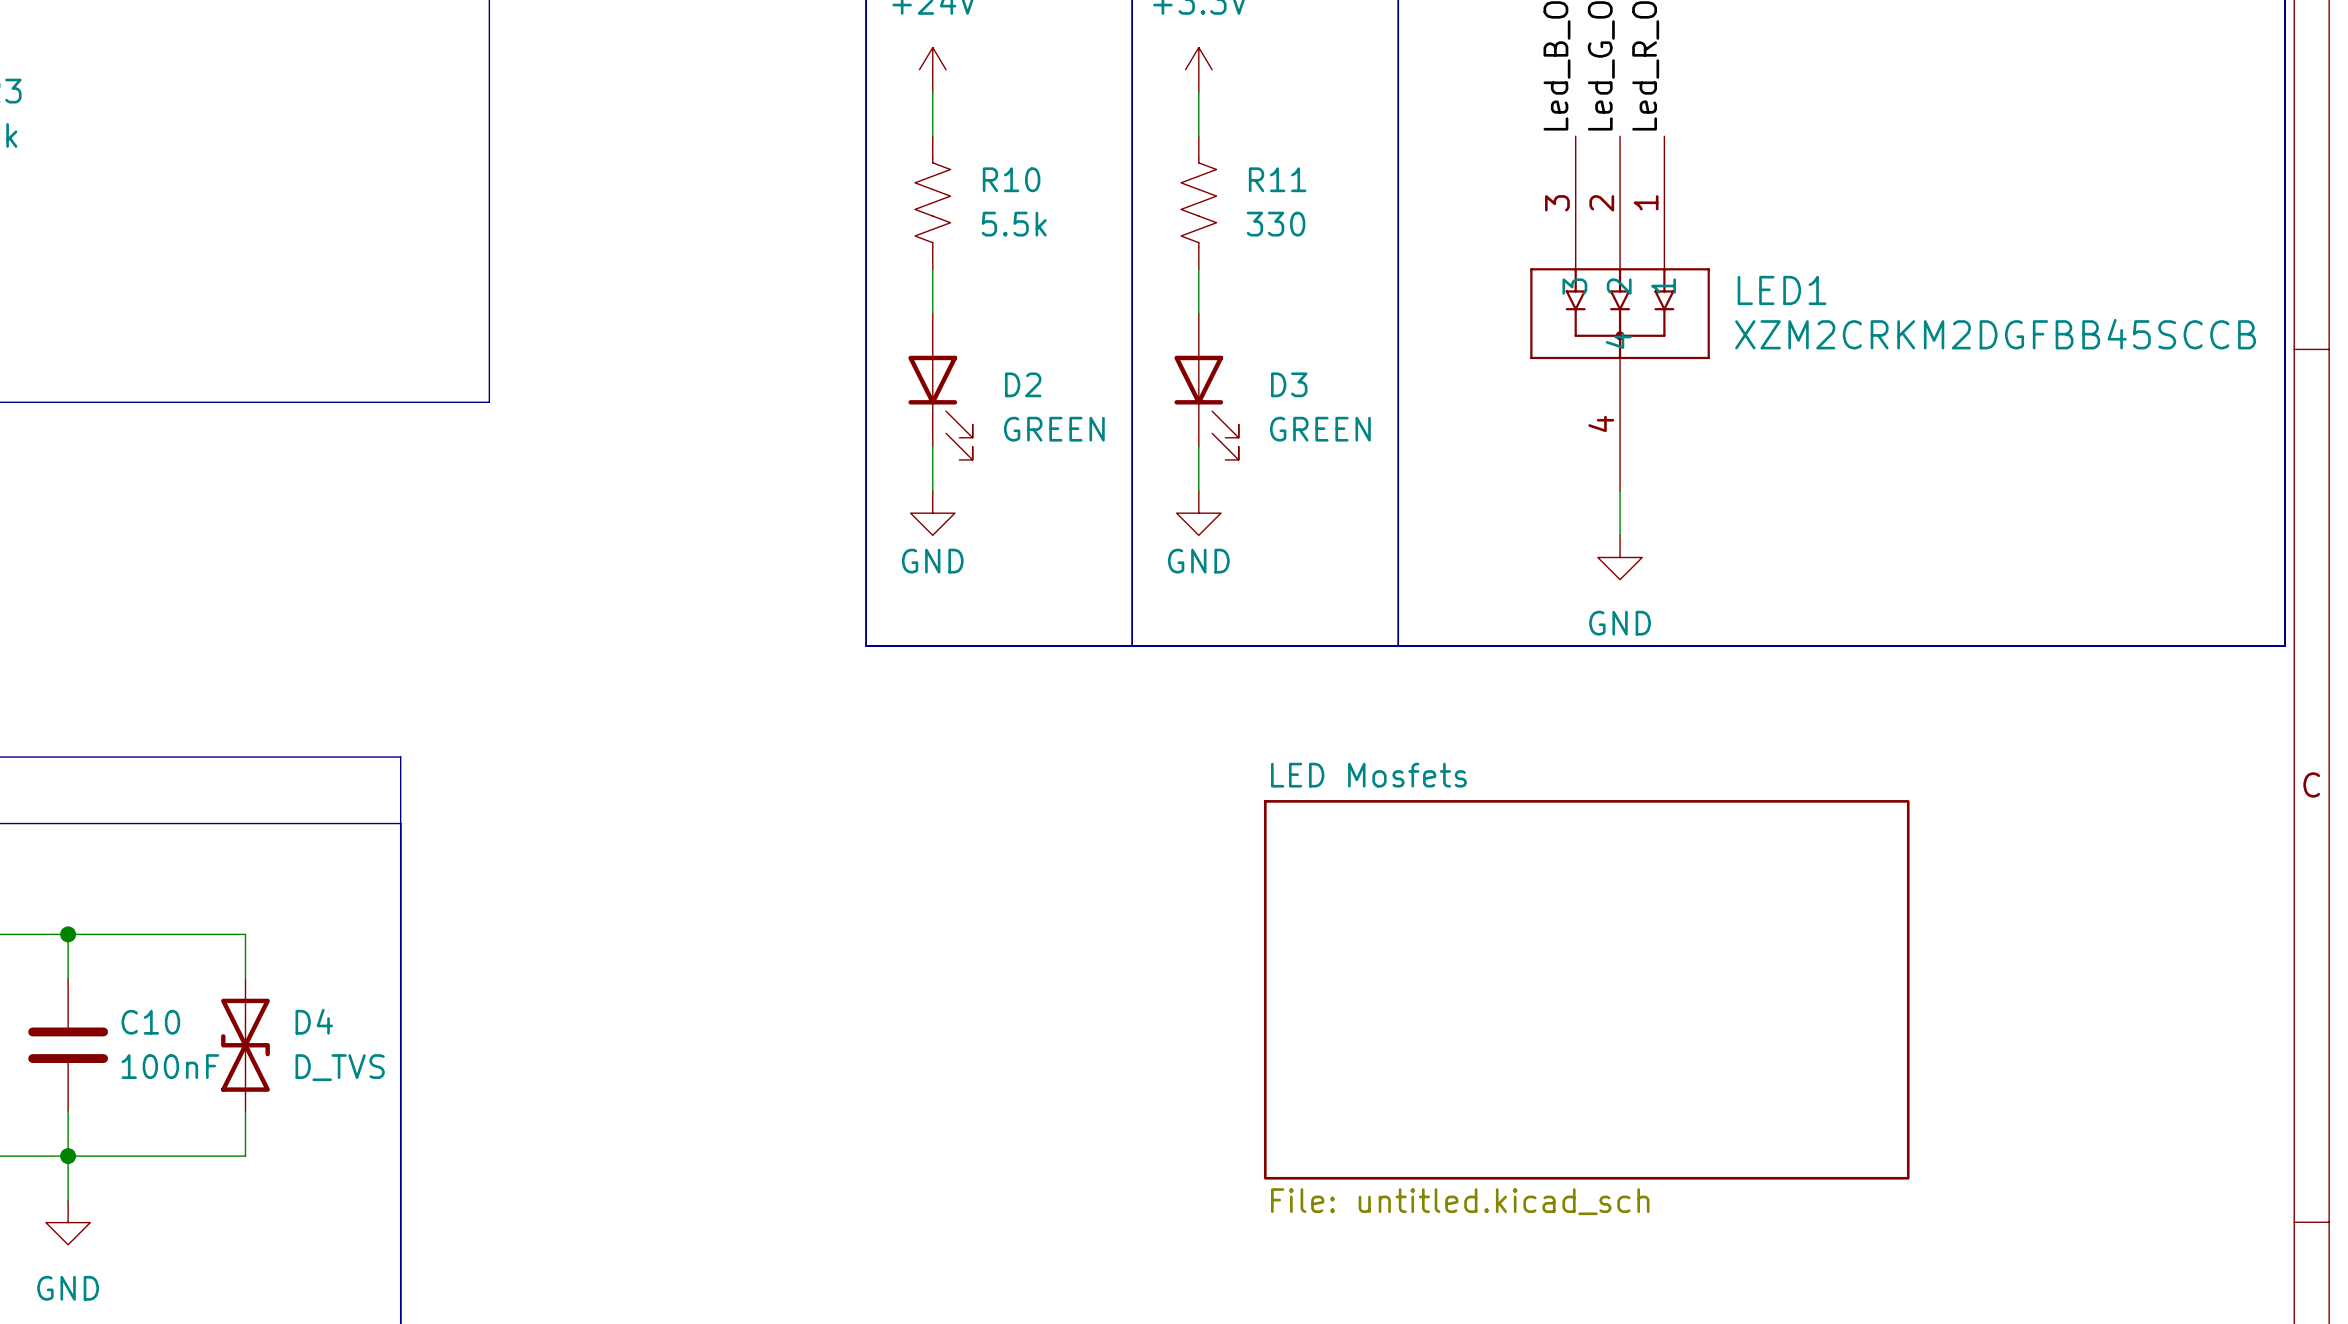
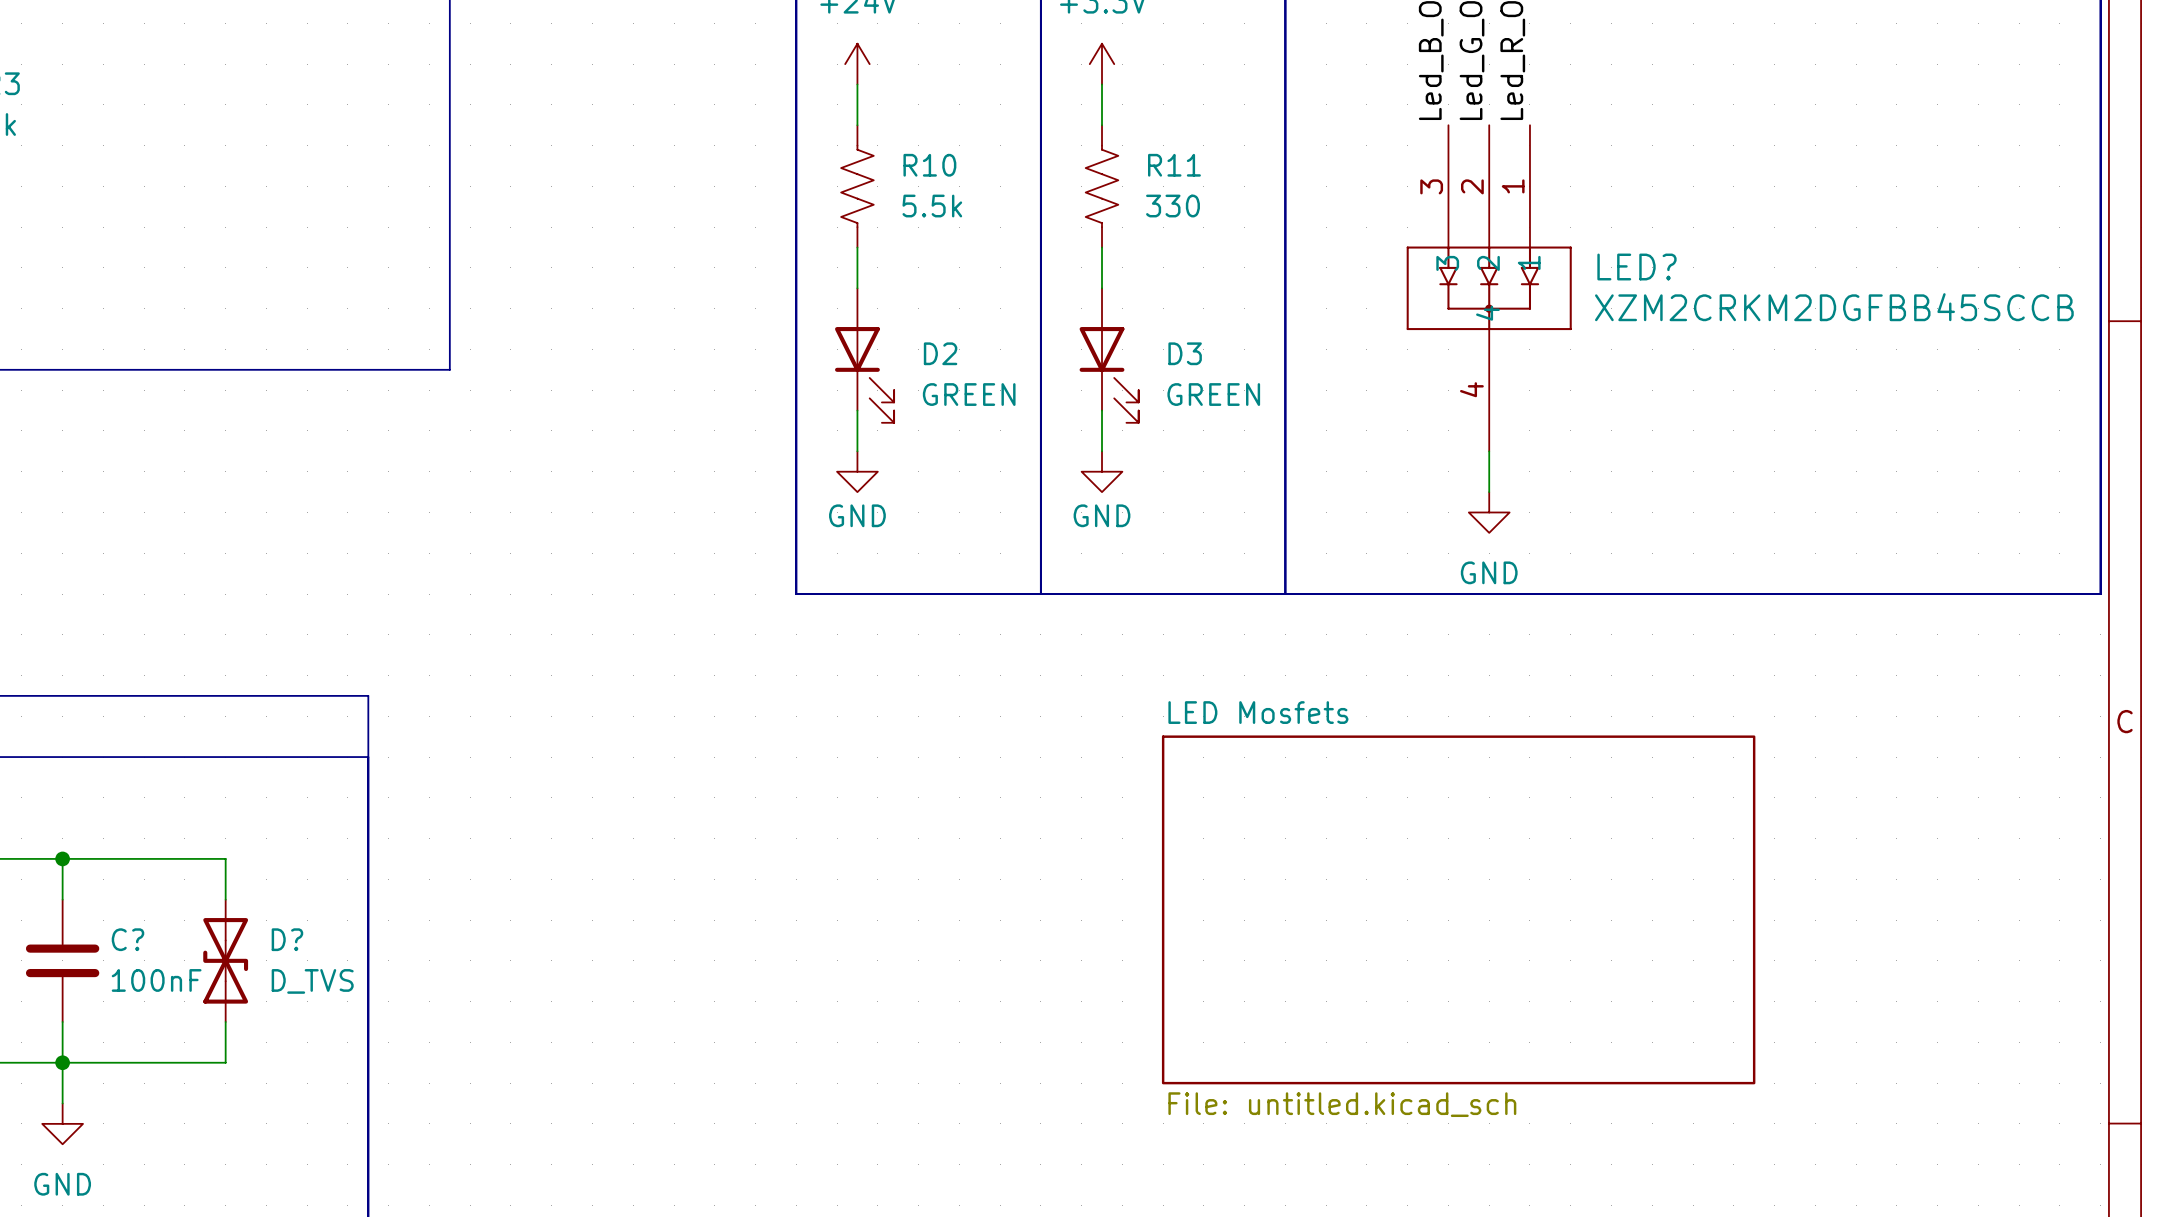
LED1 name: LED1 (1782, 290) -> LED? (1636, 267)
D4 name: D4 (314, 1021) -> D? (287, 939)
C10 name: C10 (150, 1022) -> C? (127, 939)

